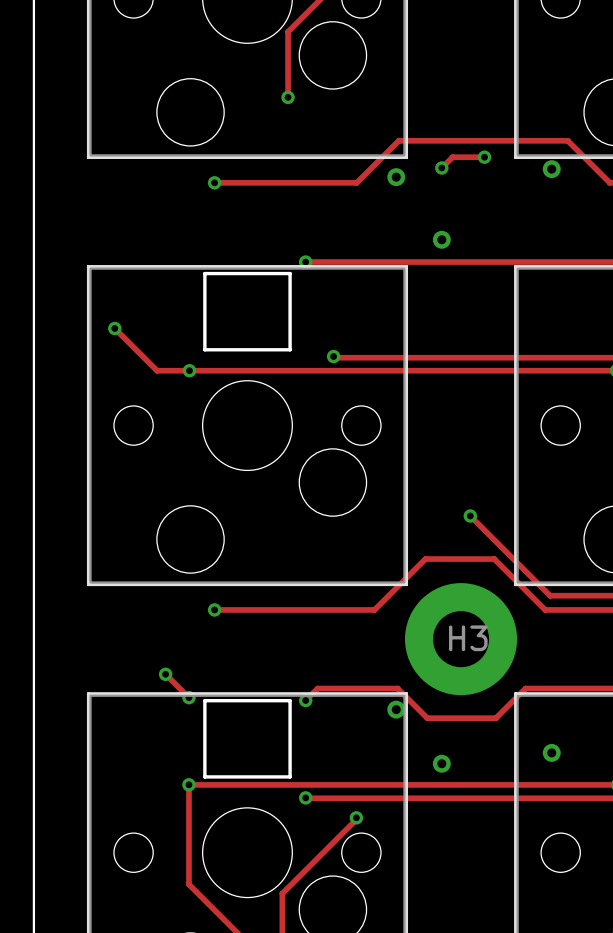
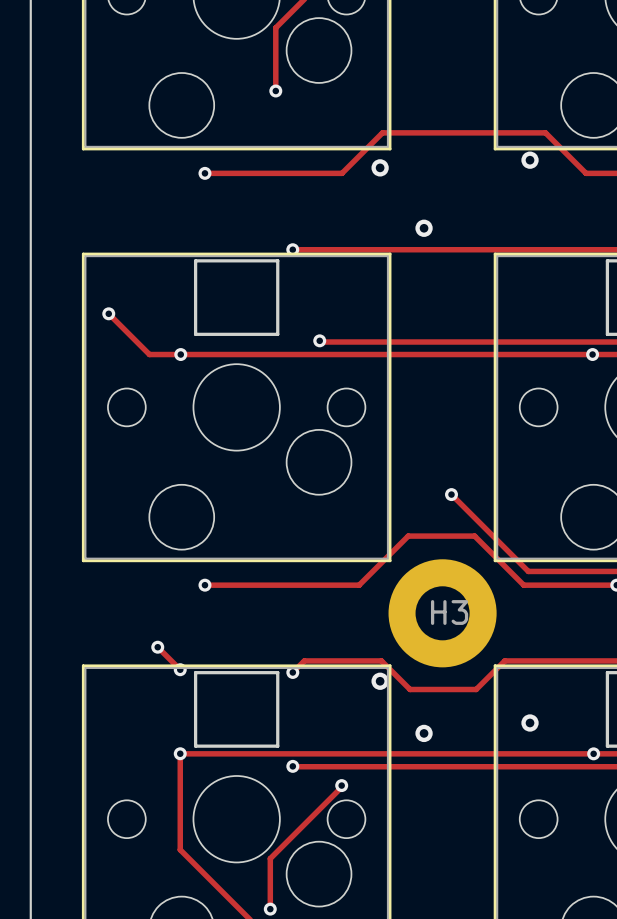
track: (484, 157) (452, 157) (441, 168) -> none
via: (484, 157) -> none
via: (441, 168) -> none

